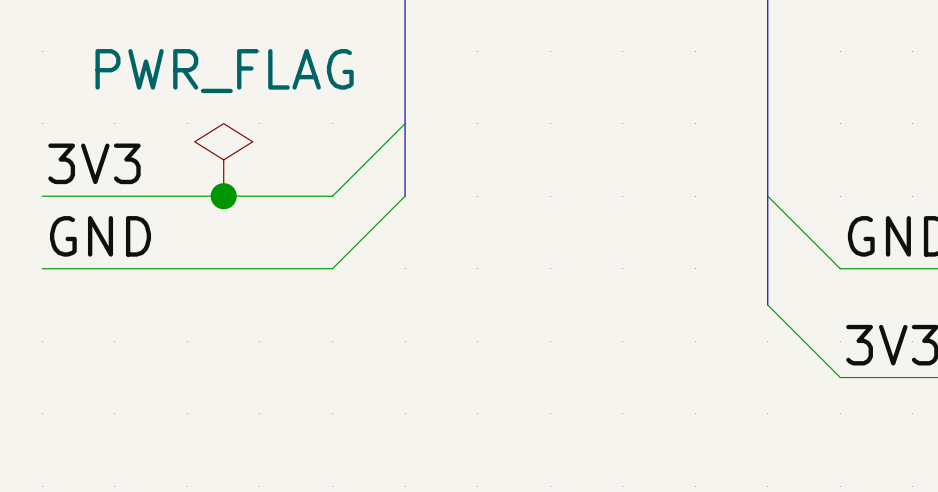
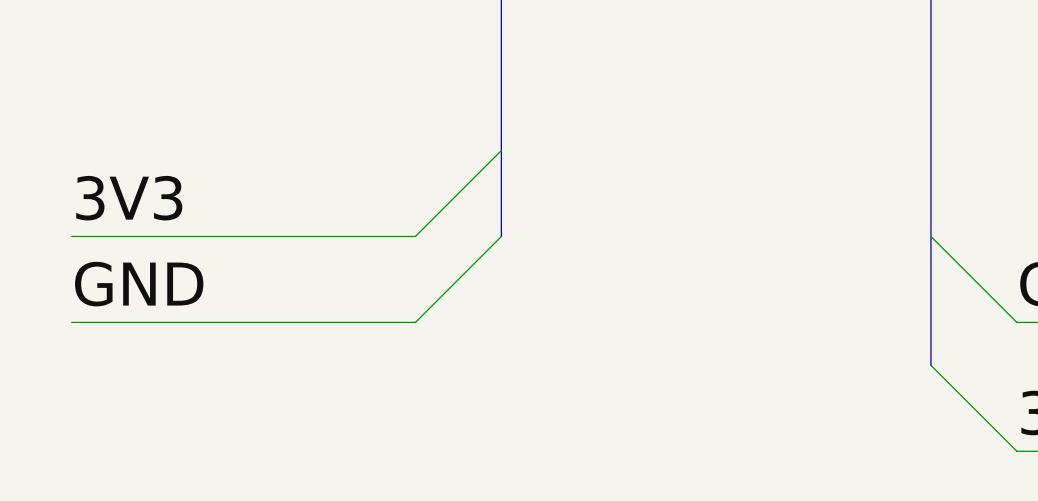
power symbol: PWR_FLAG (223, 159) -> none
junction: (223, 196) -> none

